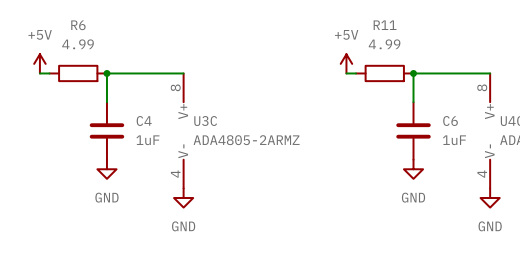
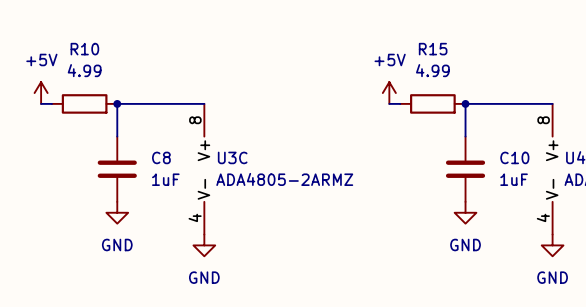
R6 name: R6 (78, 25) -> R10 (84, 49)
R11 name: R11 (385, 25) -> R15 (433, 49)
C4 name: C4 (144, 121) -> C8 (161, 157)
C6 name: C6 (450, 121) -> C10 (514, 157)

